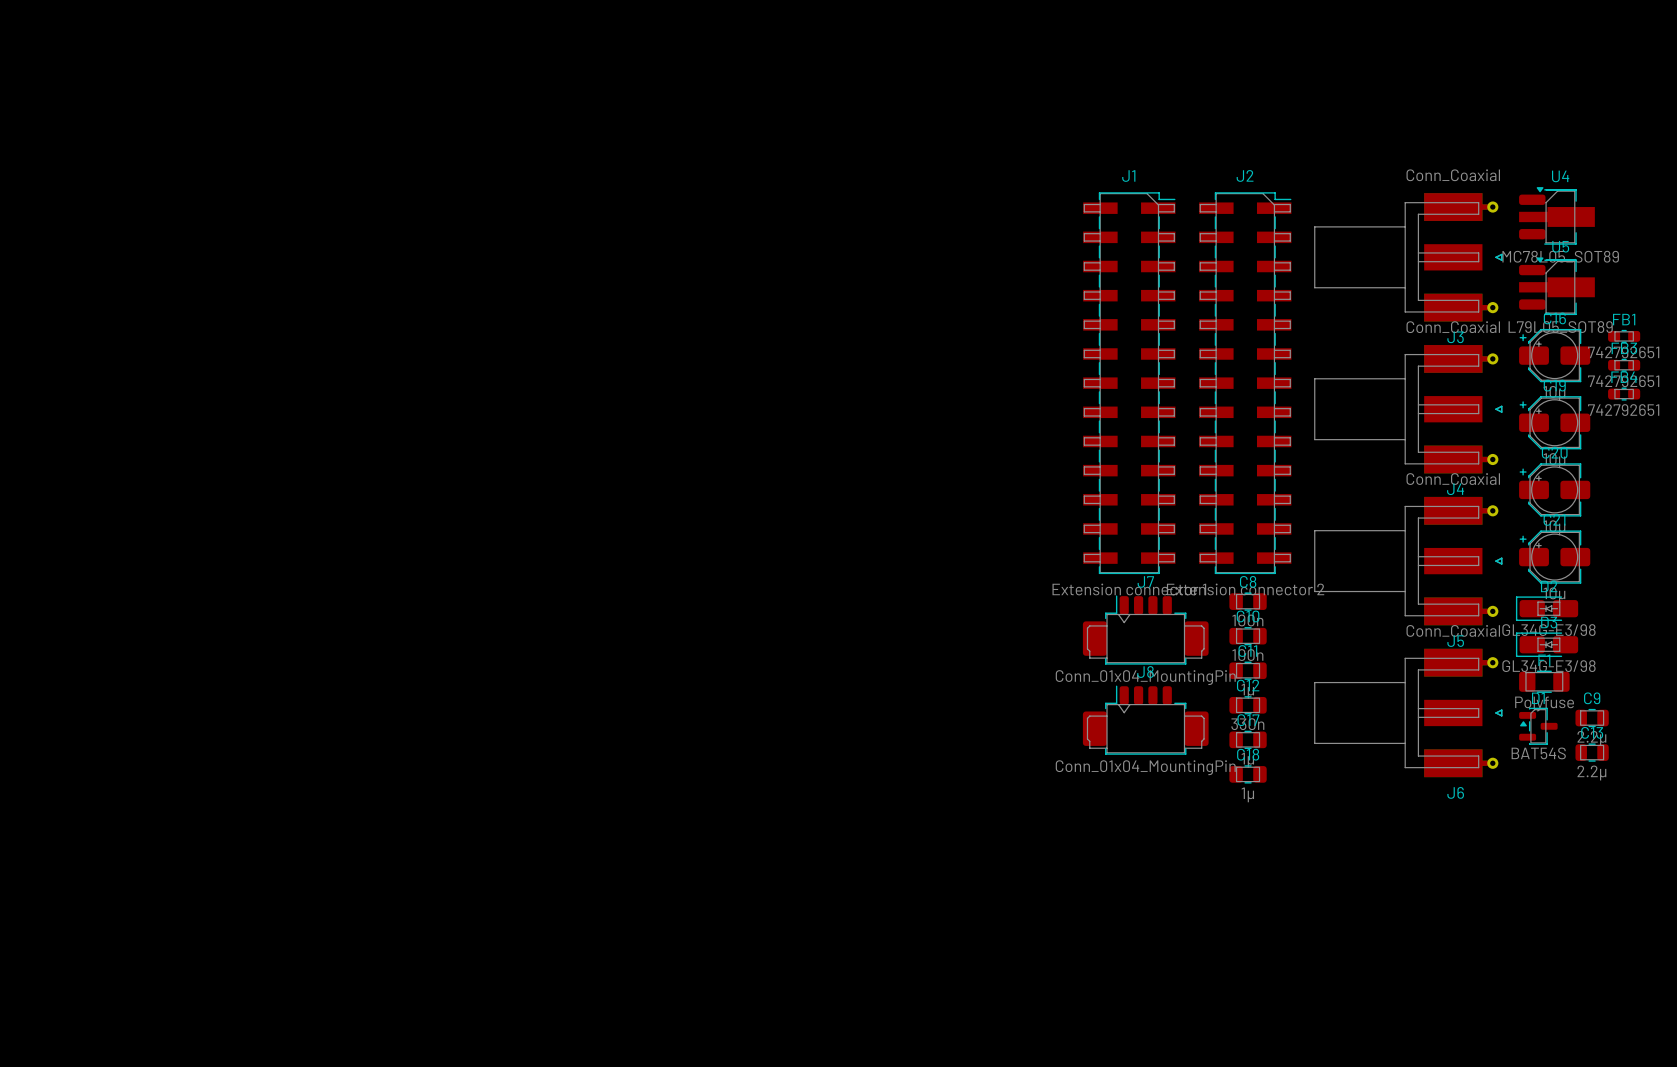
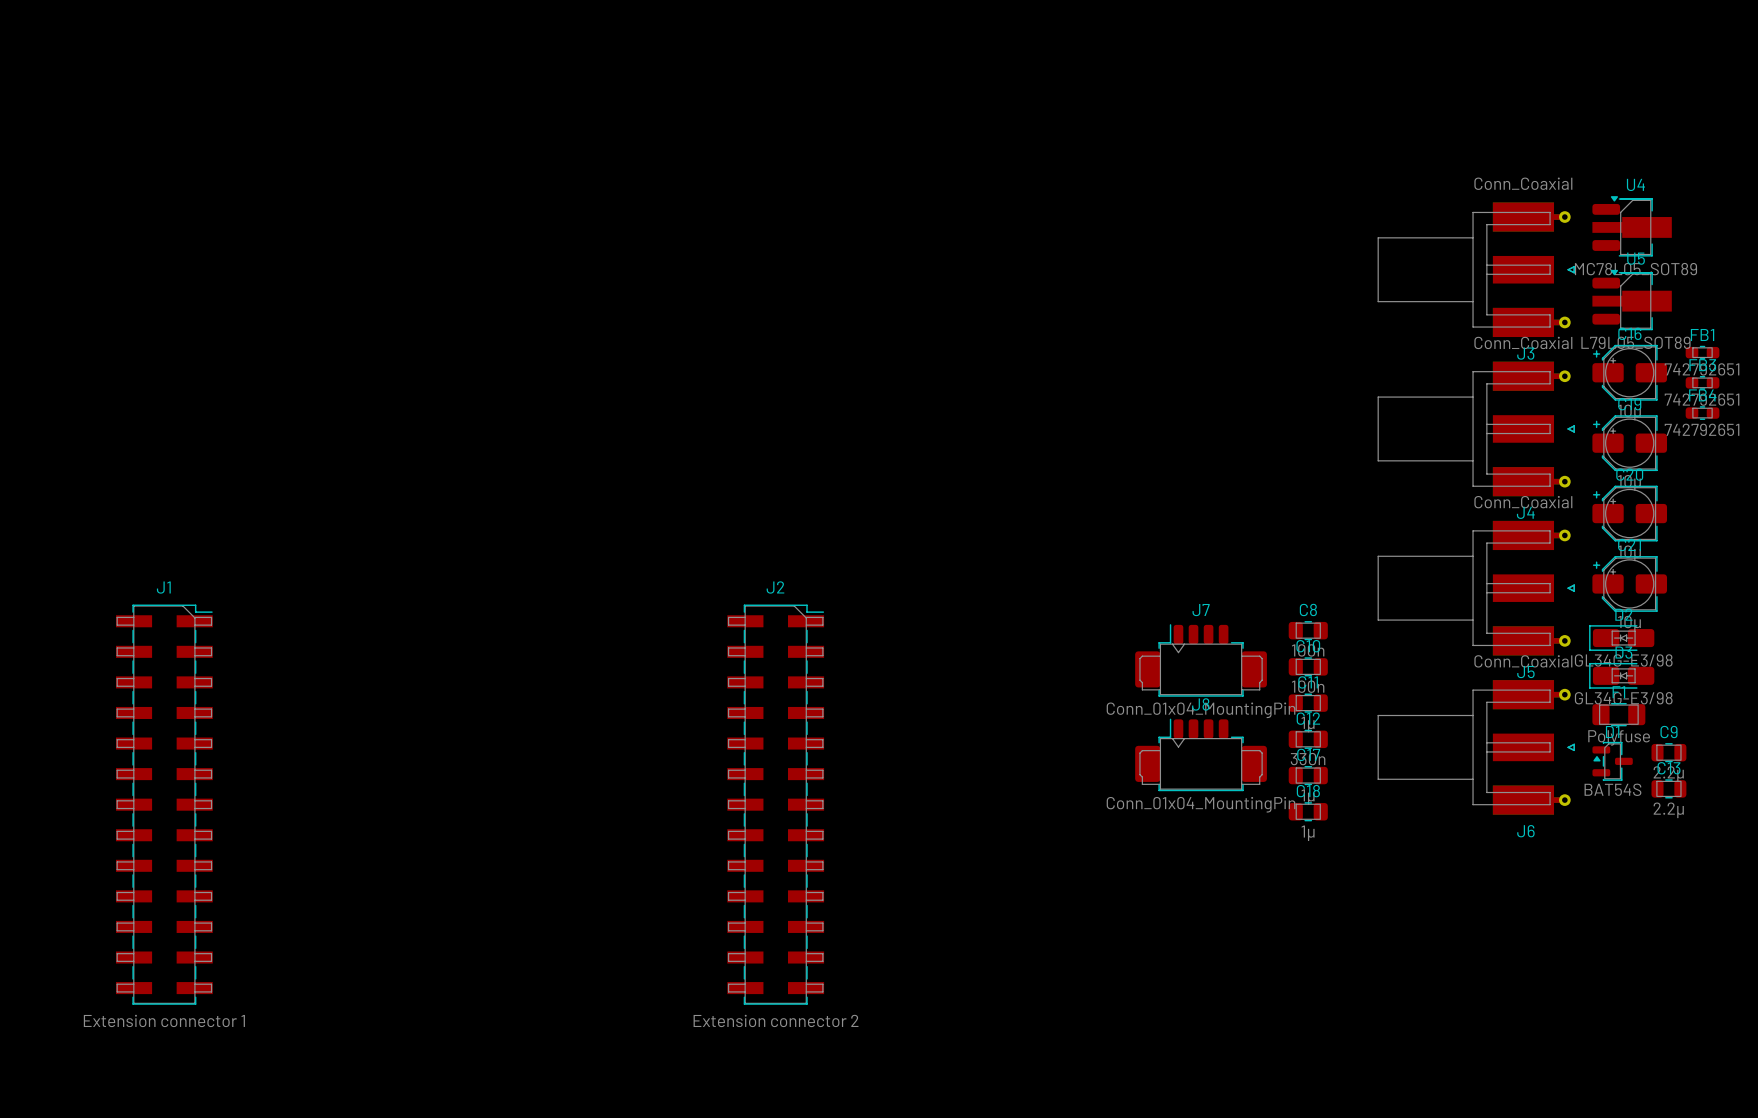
J1 position: (1129, 383) -> (164, 804)
J2 position: (1245, 383) -> (775, 804)

